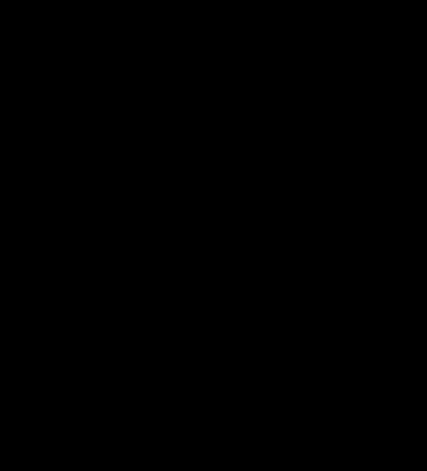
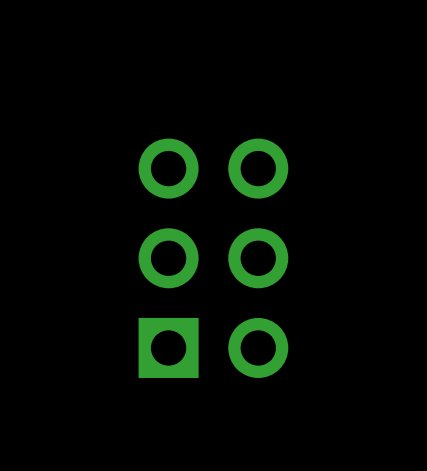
part: none -> (213, 258)

